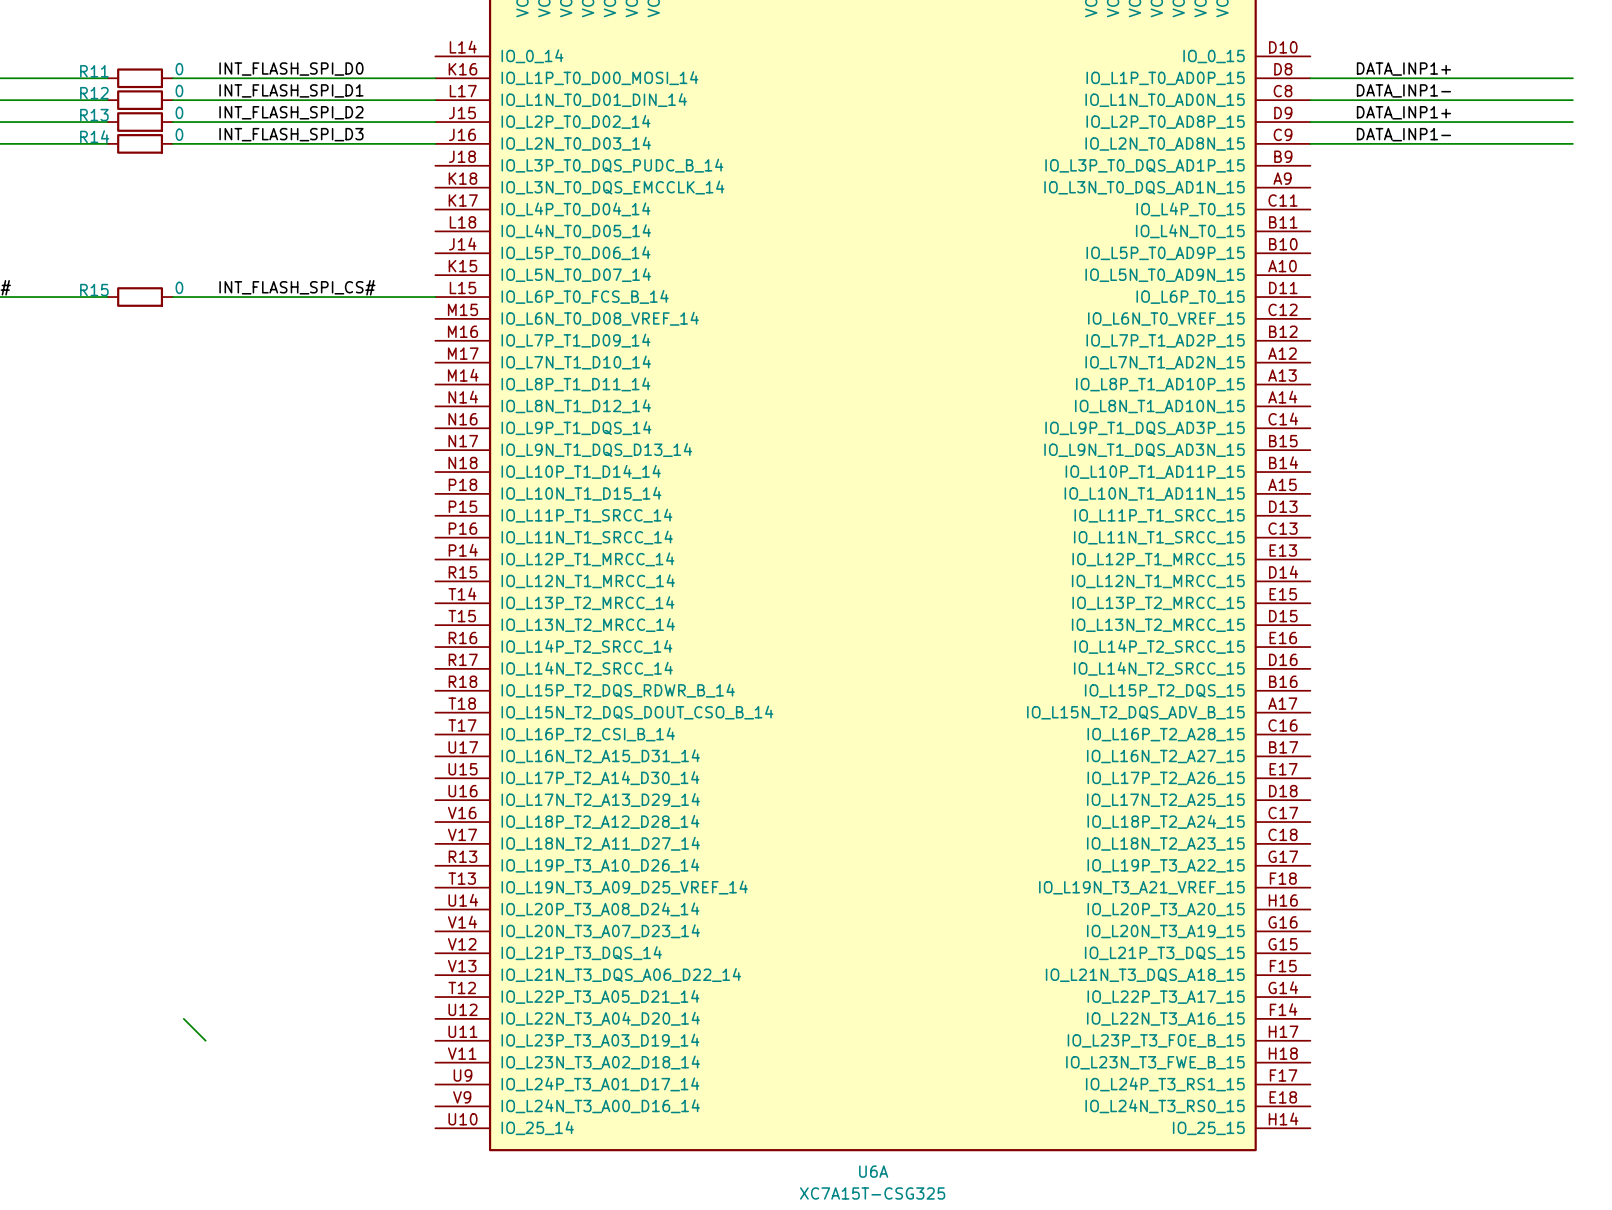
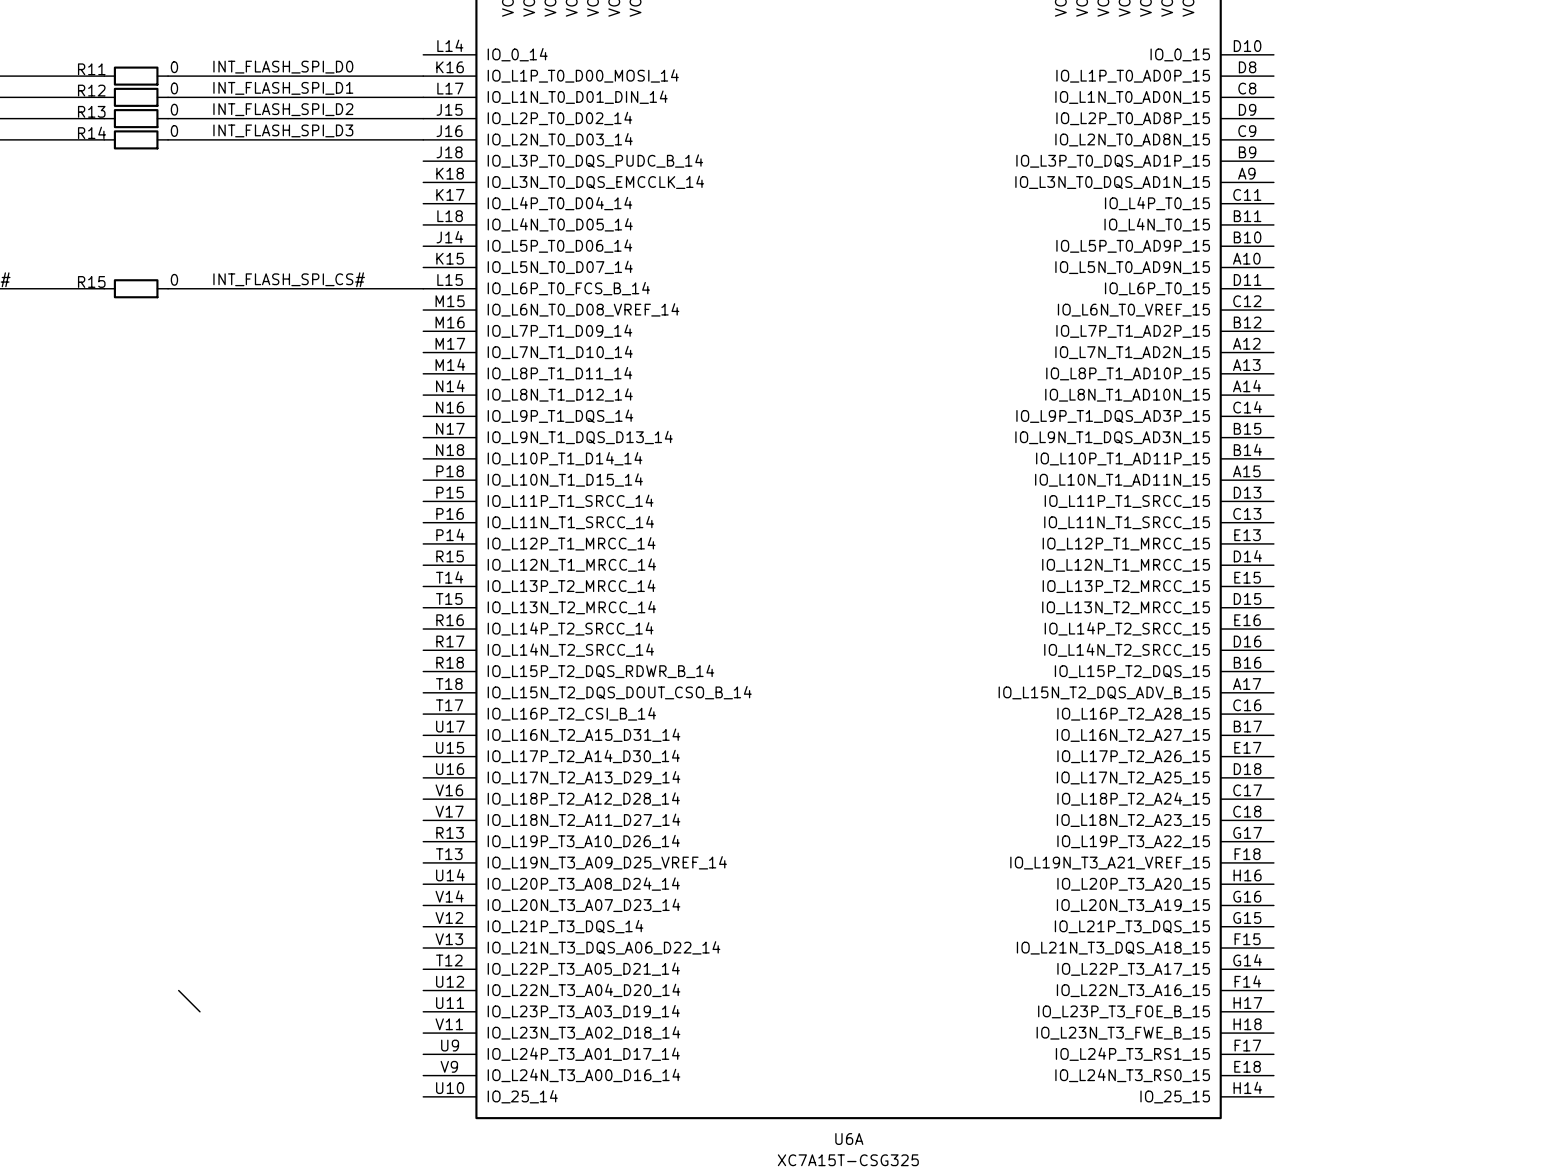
label: DATA_INP1+ (1403, 69) -> none
wire: (1310, 78) (1572, 78) -> none
label: DATA_INP1- (1403, 90) -> none
wire: (1310, 100) (1572, 100) -> none
label: DATA_INP1+ (1403, 112) -> none
wire: (1310, 122) (1572, 122) -> none
label: DATA_INP1- (1403, 134) -> none
wire: (1310, 143) (1572, 143) -> none

